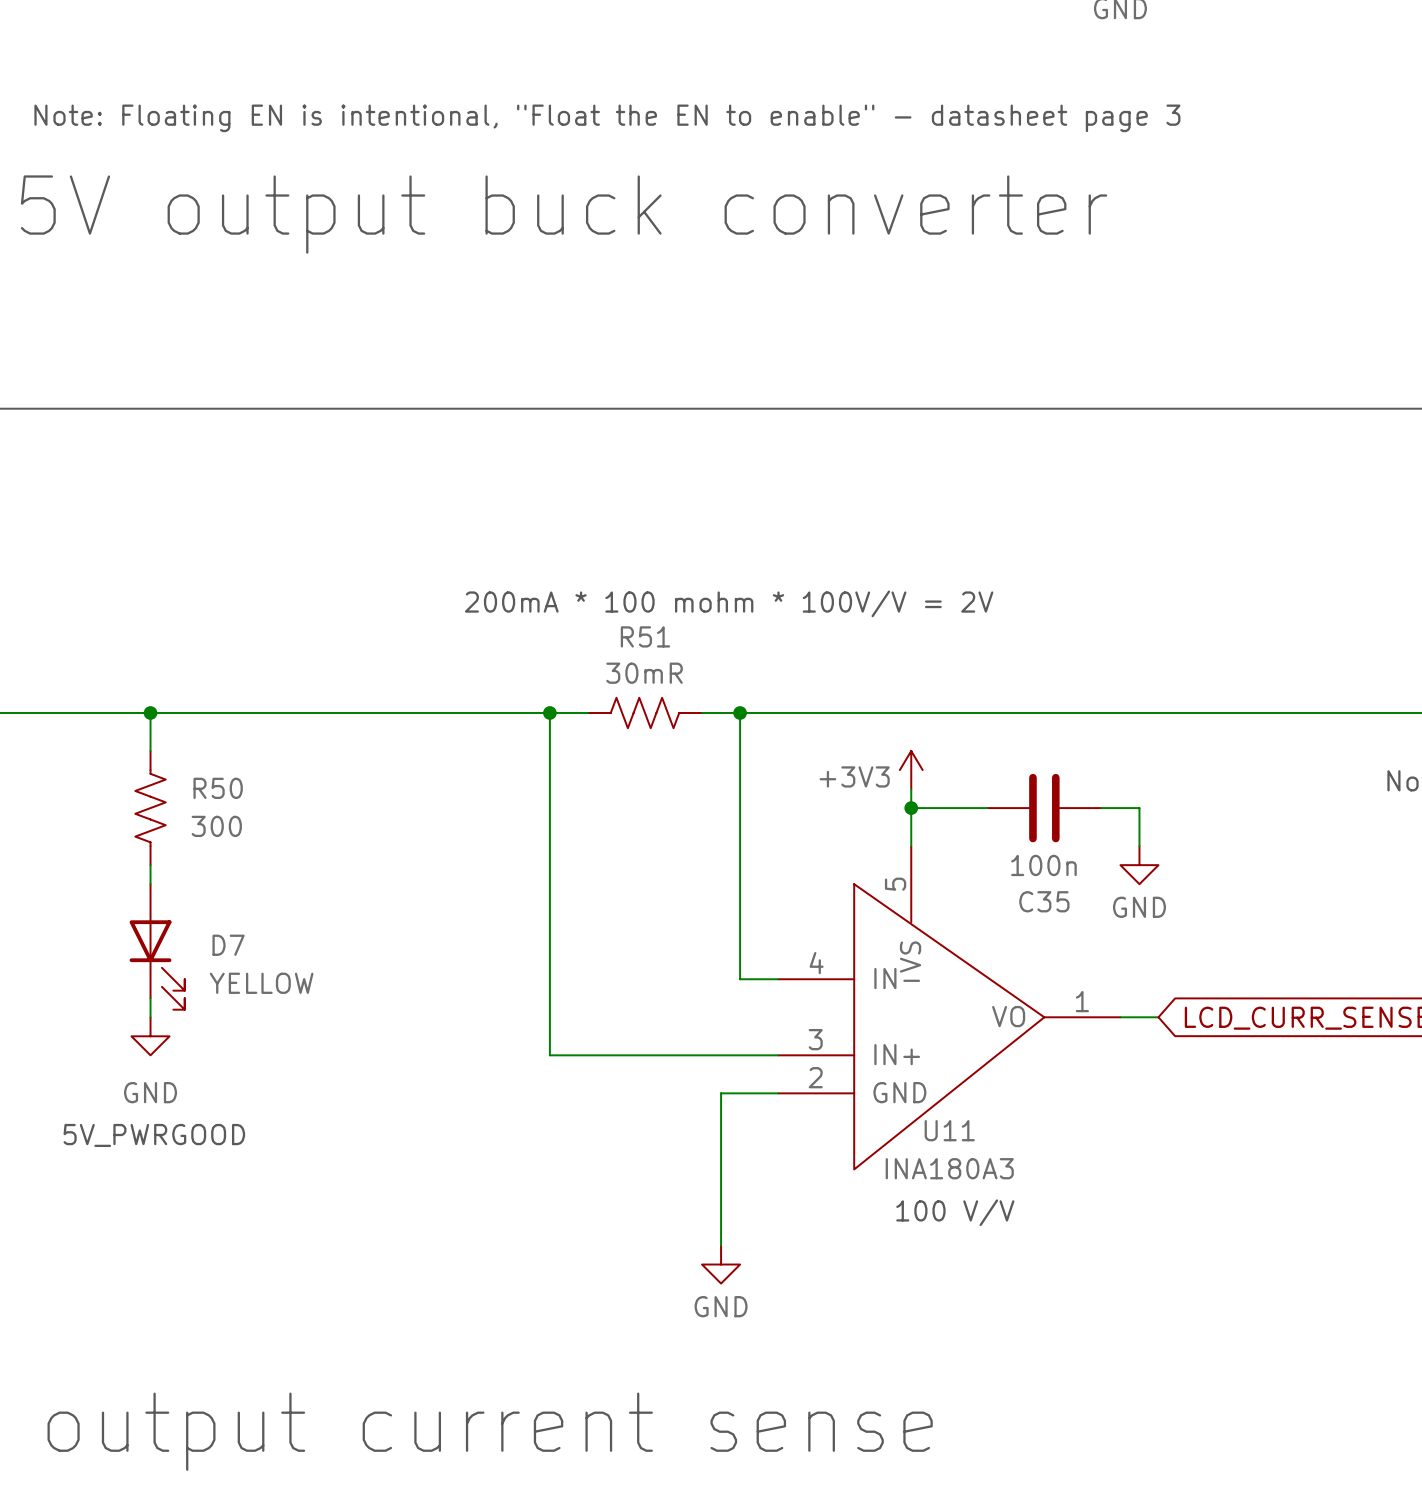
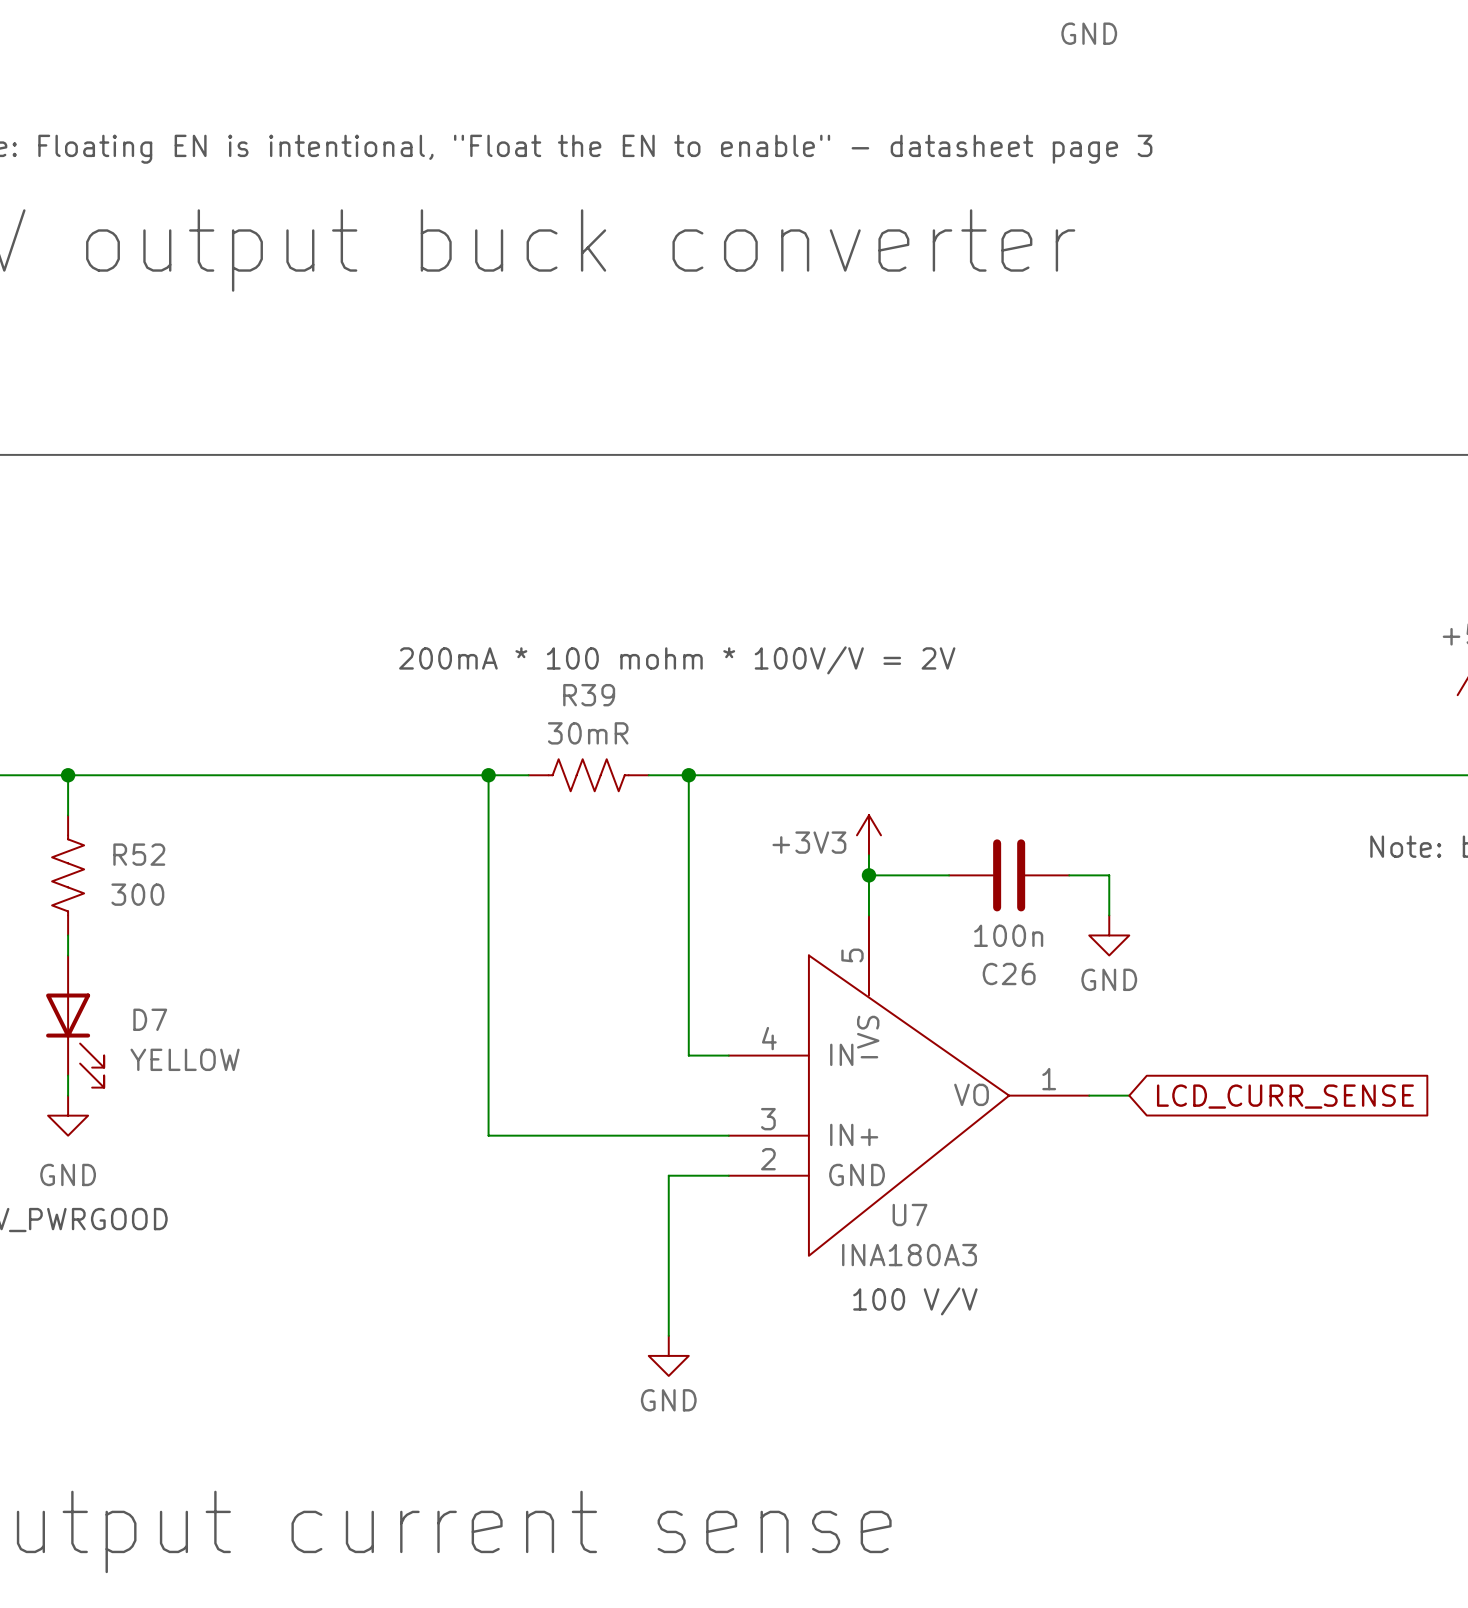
R51 name: R51 (645, 636) -> R39 (589, 695)
R50 name: R50 (218, 788) -> R52 (139, 854)
C35 name: C35 (1044, 901) -> C26 (1009, 974)
U11 name: U11 (949, 1130) -> U7 (909, 1215)

